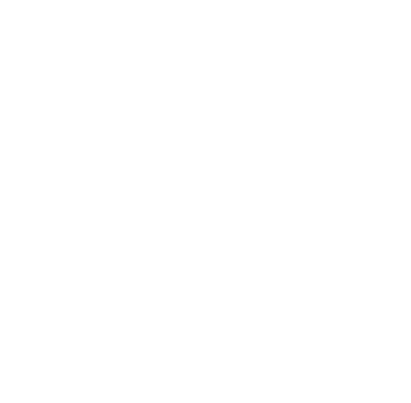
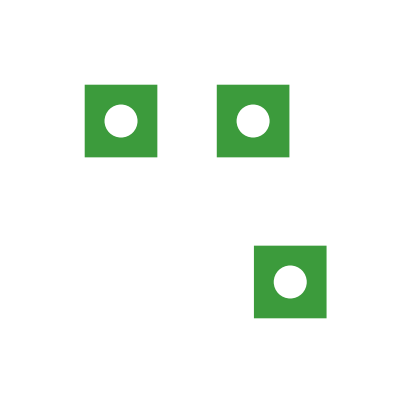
part: none -> (121, 121)
part: none -> (253, 121)
part: none -> (290, 281)

